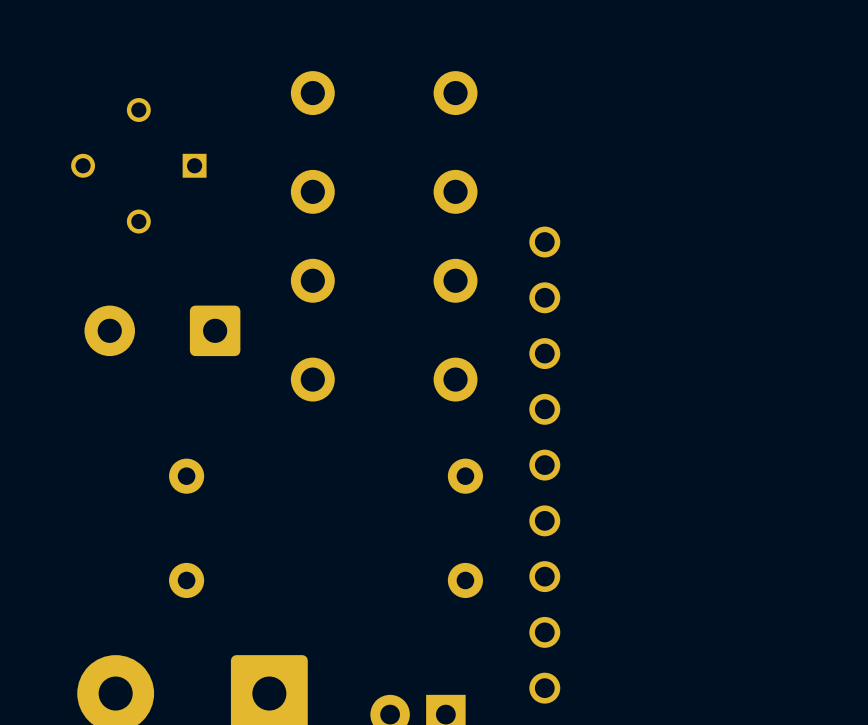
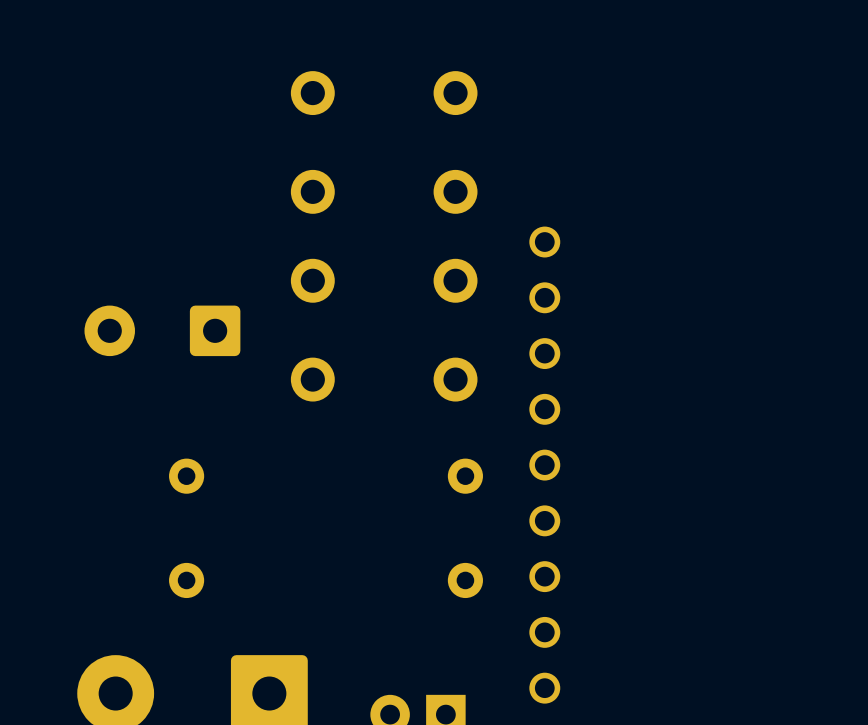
part: (138, 165) -> none

